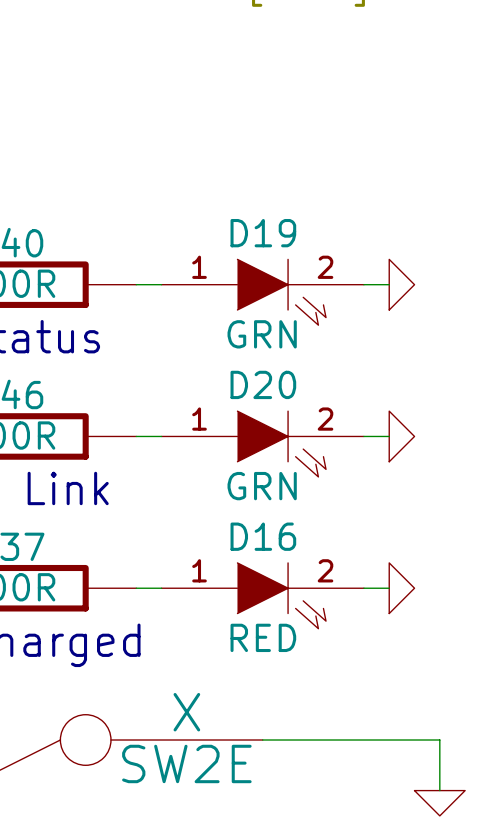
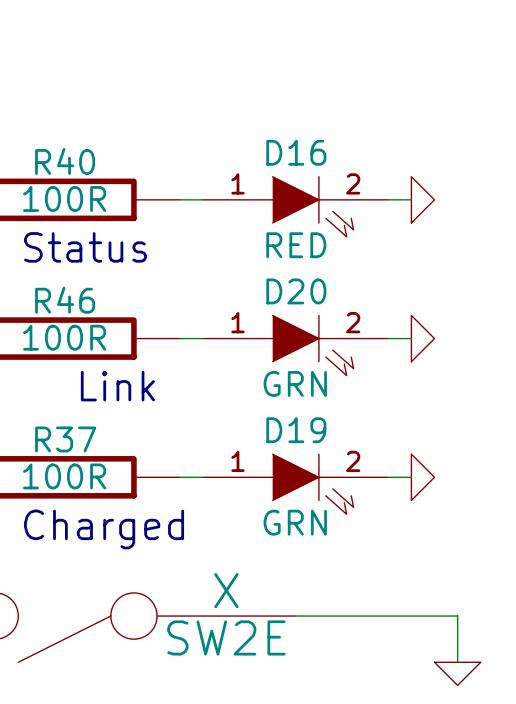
D19 name: D19 (263, 233) -> D16 (296, 152)
D19 value: GRN (262, 334) -> RED (296, 245)
D16 name: D16 (263, 536) -> D19 (296, 430)
D16 value: RED (263, 637) -> GRN (295, 522)

